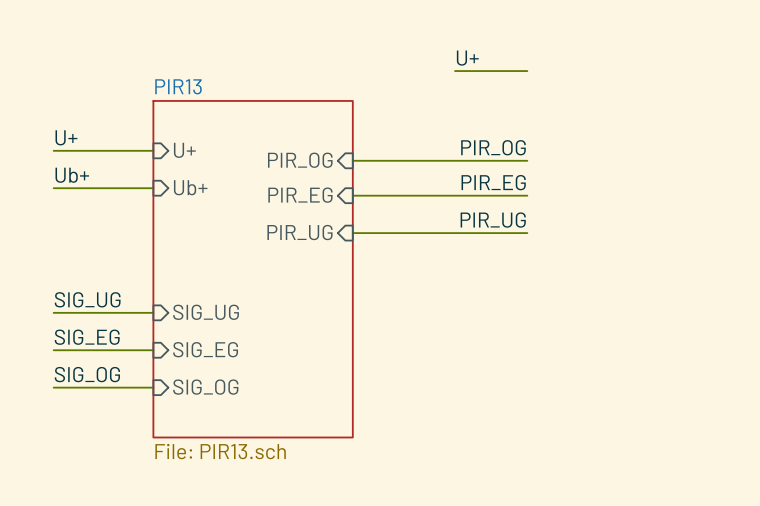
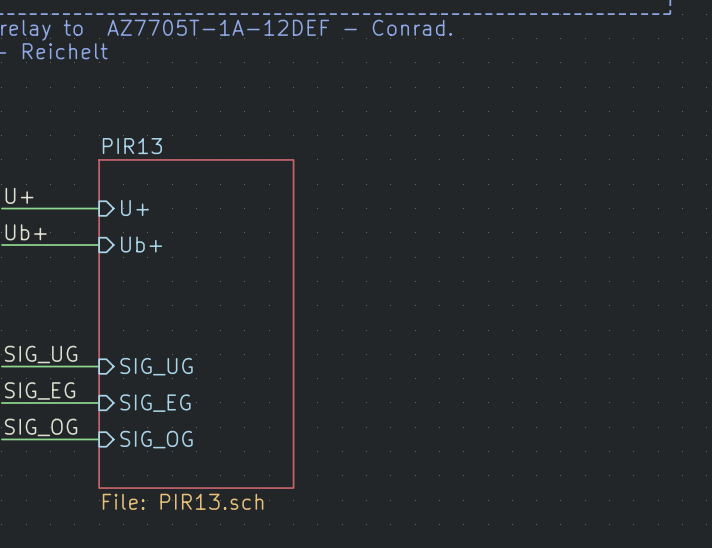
label: U+ (467, 58) -> none
wire: (455, 71) (527, 71) -> none
label: PIR_OG (493, 147) -> none
sheet pin: PIR_OG (300, 160) -> none
wire: (352, 160) (527, 160) -> none
label: PIR_EG (493, 182) -> none
sheet pin: PIR_EG (300, 195) -> none
wire: (352, 195) (527, 195) -> none
label: PIR_UG (493, 220) -> none
sheet pin: PIR_UG (300, 232) -> none
wire: (352, 233) (527, 233) -> none

